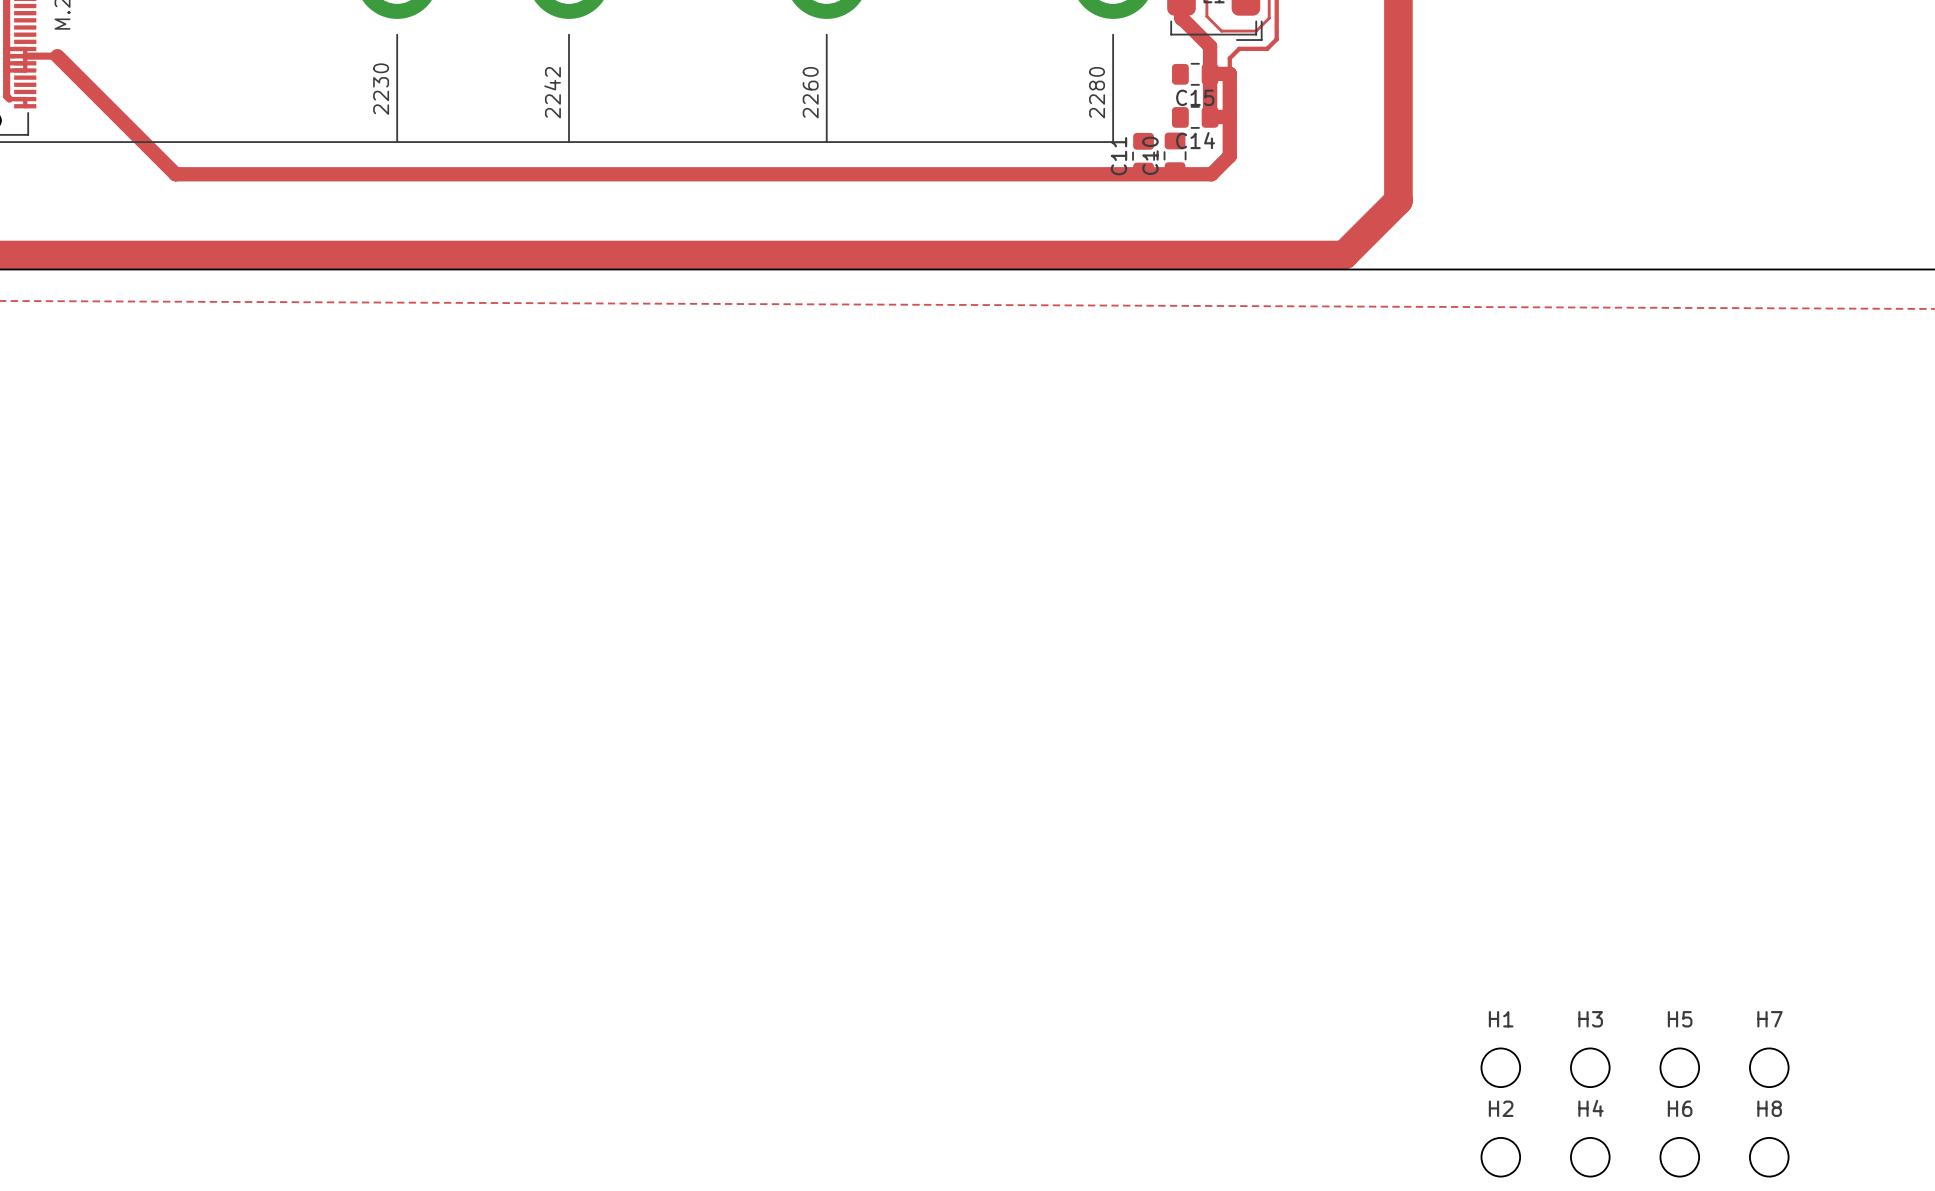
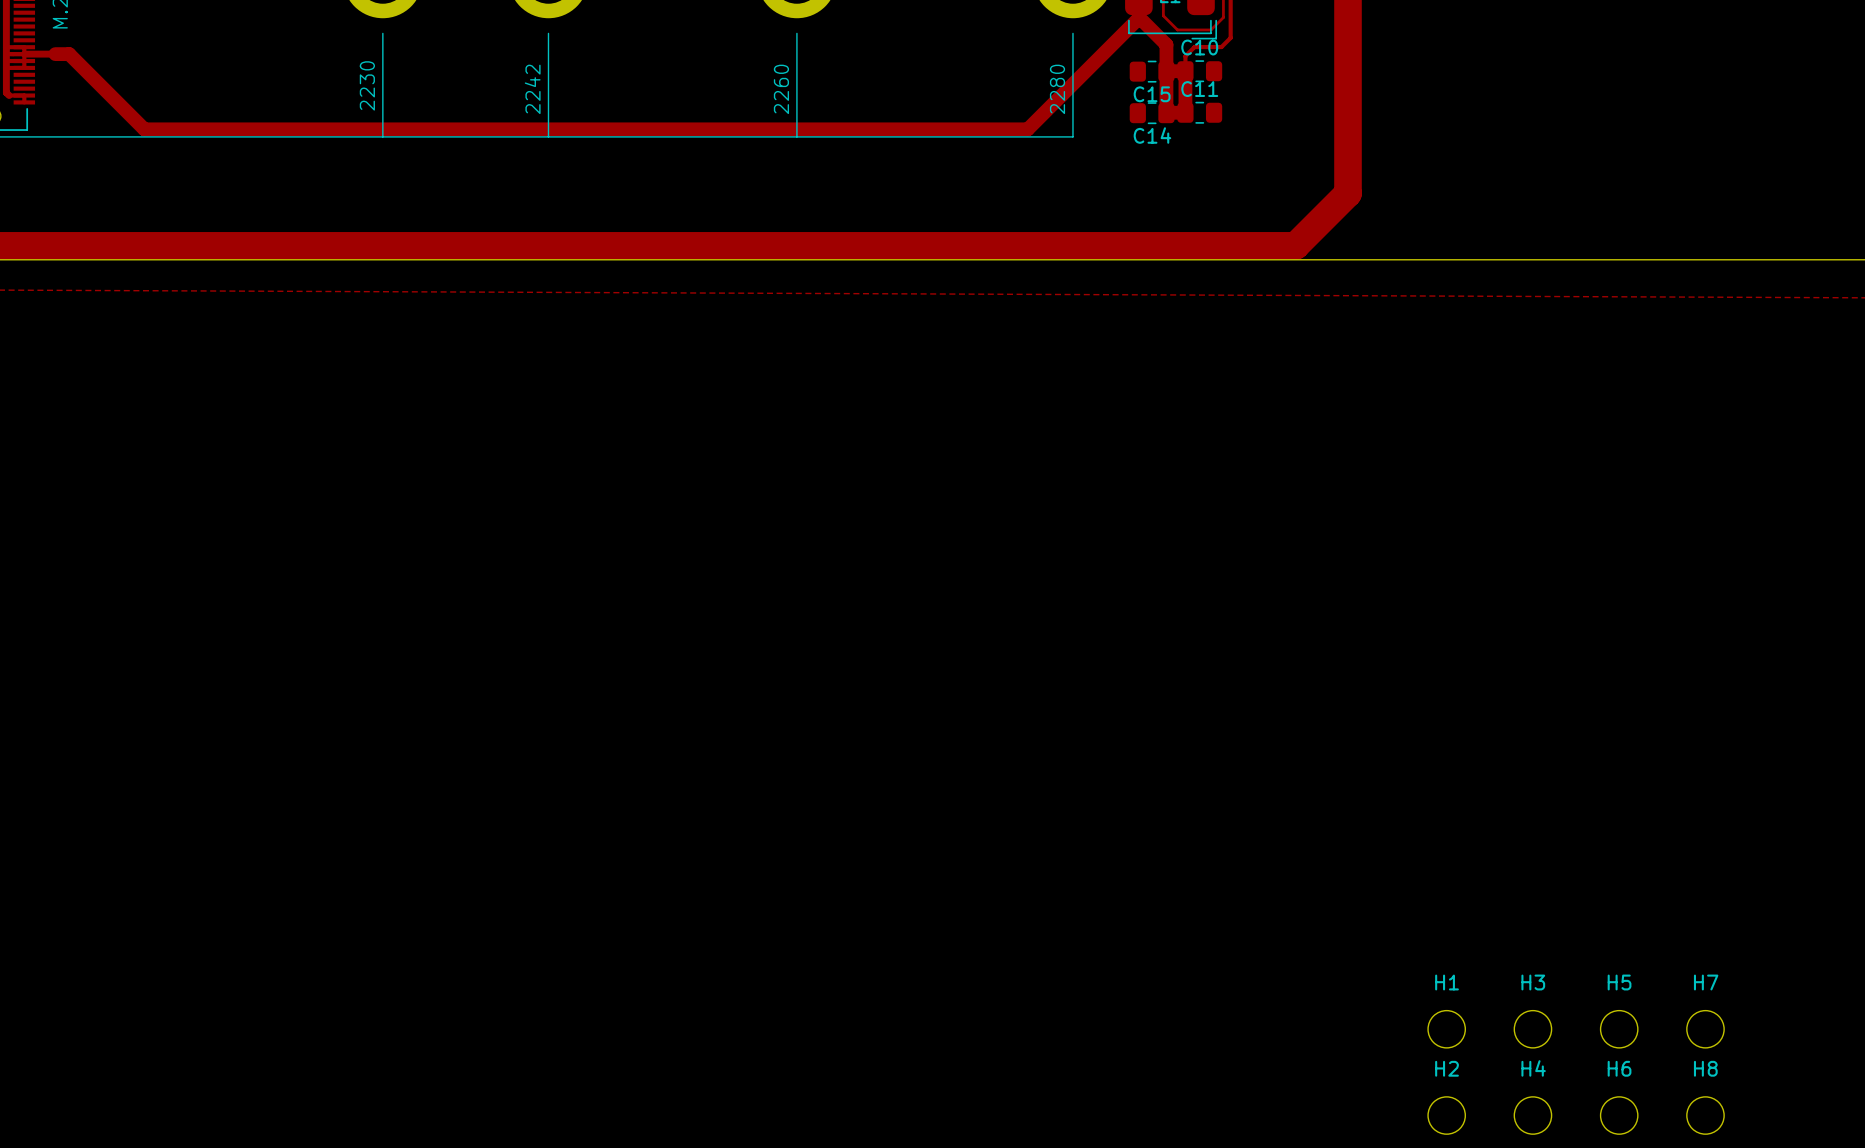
track: (57, 56) (175, 174) (1211, 174) (1229, 156) (1229, 116) -> (55, 54) (69, 54) (144, 129) (1027, 129) (1138, 18)
C10 rotation: 0° (1175, 155) -> 90° clockwise (1199, 71)
C10 position: (1175, 155) -> (1199, 71)
C11 rotation: 0° (1143, 156) -> 90° clockwise (1199, 112)
C11 position: (1143, 156) -> (1199, 112)

